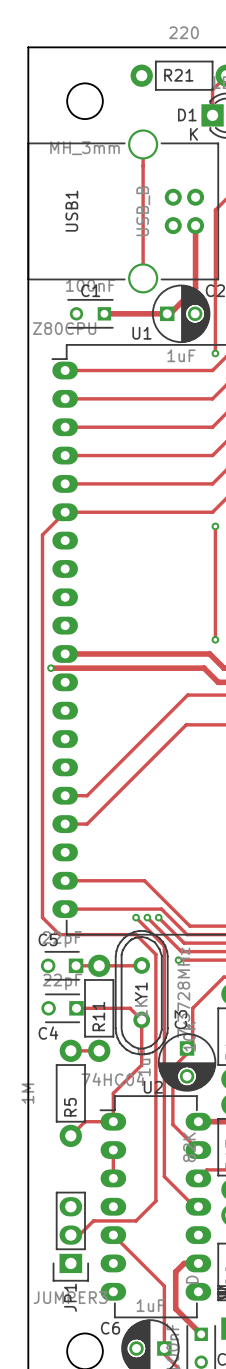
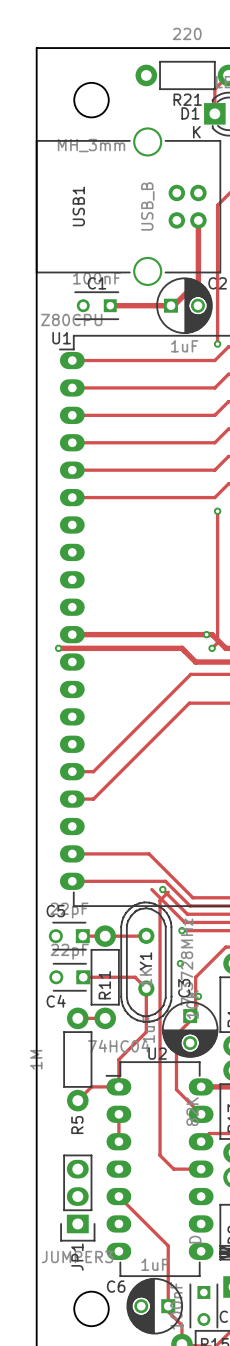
R21 name position: R21 (178, 75) -> R21 (187, 99)
track: (143, 144) (143, 278) -> none
U1 name position: U1 (141, 333) -> U1 (61, 338)
track: (65, 512) (42, 534) (42, 917) (59, 934) (136, 934) (155, 954) -> (168, 892) (160, 900) (160, 925)
track: none -> (217, 620) (217, 642) (212, 648)
via: (215, 639) -> none
via: none -> (206, 634)
track: (178, 668) (204, 668) (218, 682) -> (181, 648) (195, 662) (220, 662)
via: none -> (212, 648)
track: (136, 917) (164, 945) (164, 1176) (194, 1206) -> none
via: (136, 917) -> none
via: (147, 917) -> none
via: none -> (180, 963)
via: none -> (198, 996)
R5 name position: R5 (70, 1107) -> R5 (77, 1125)
track: (155, 1192) (155, 1201) (136, 1220) (93, 1220) (79, 1235) (70, 1235) -> (160, 1155) (173, 1169) (197, 1169)
track: (198, 1263) (184, 1263) (175, 1271) (175, 1308) (201, 1334) -> none

